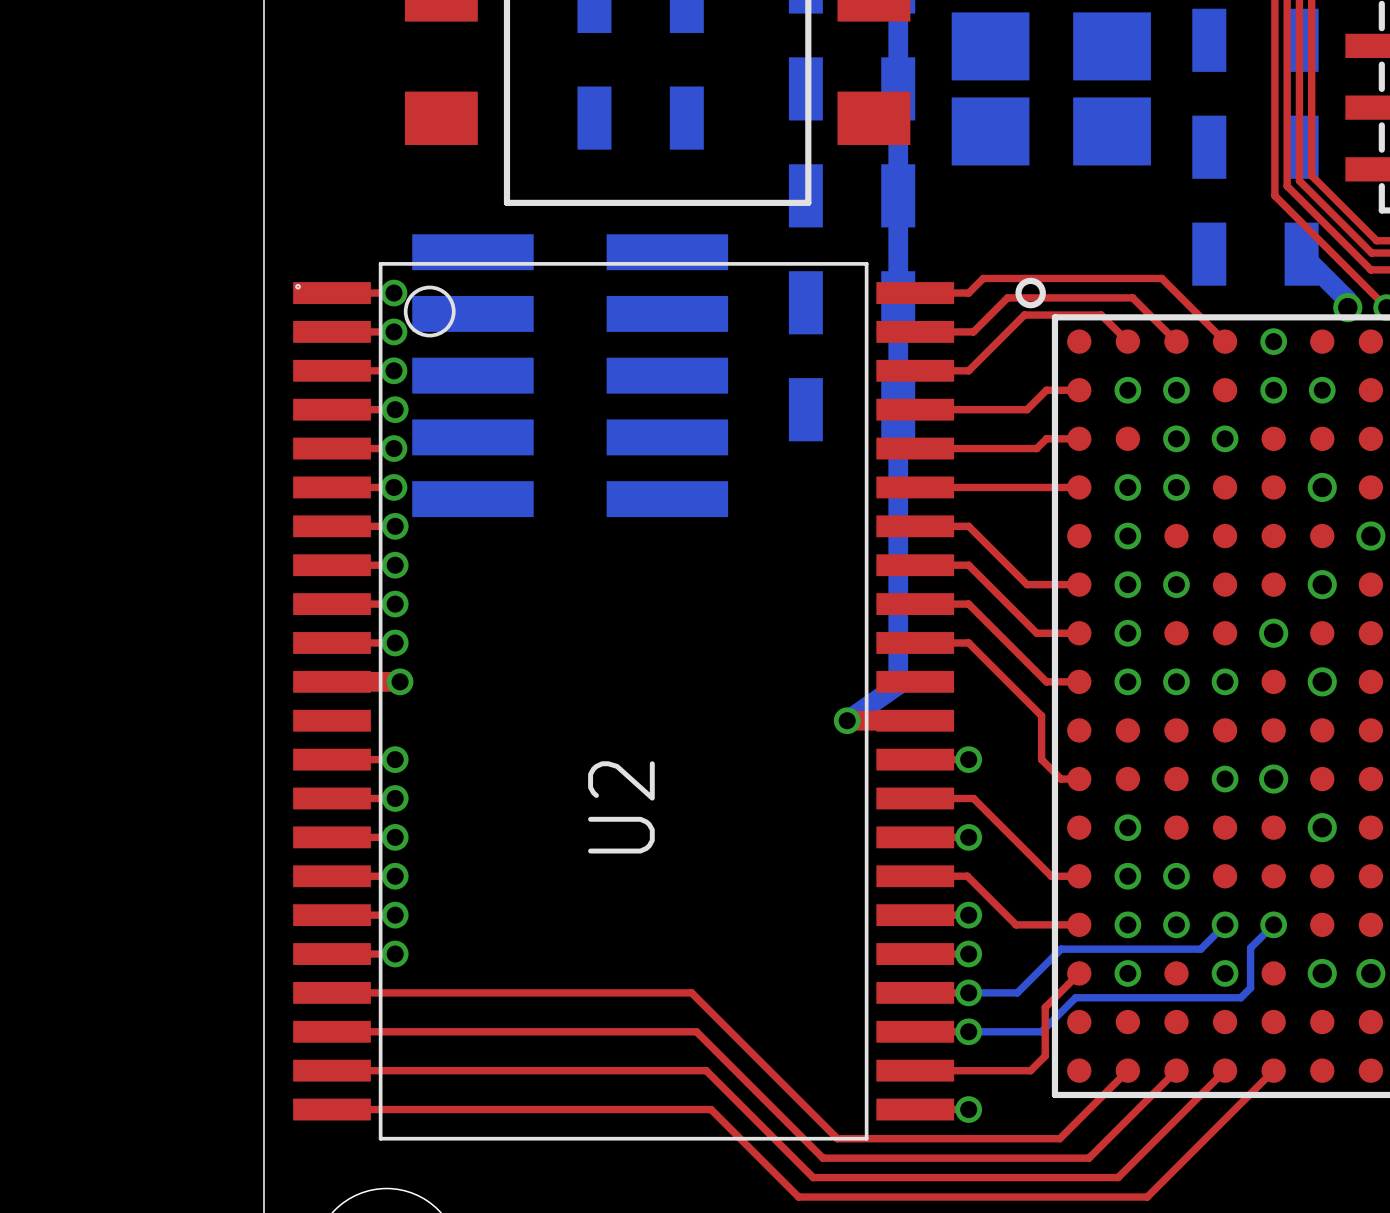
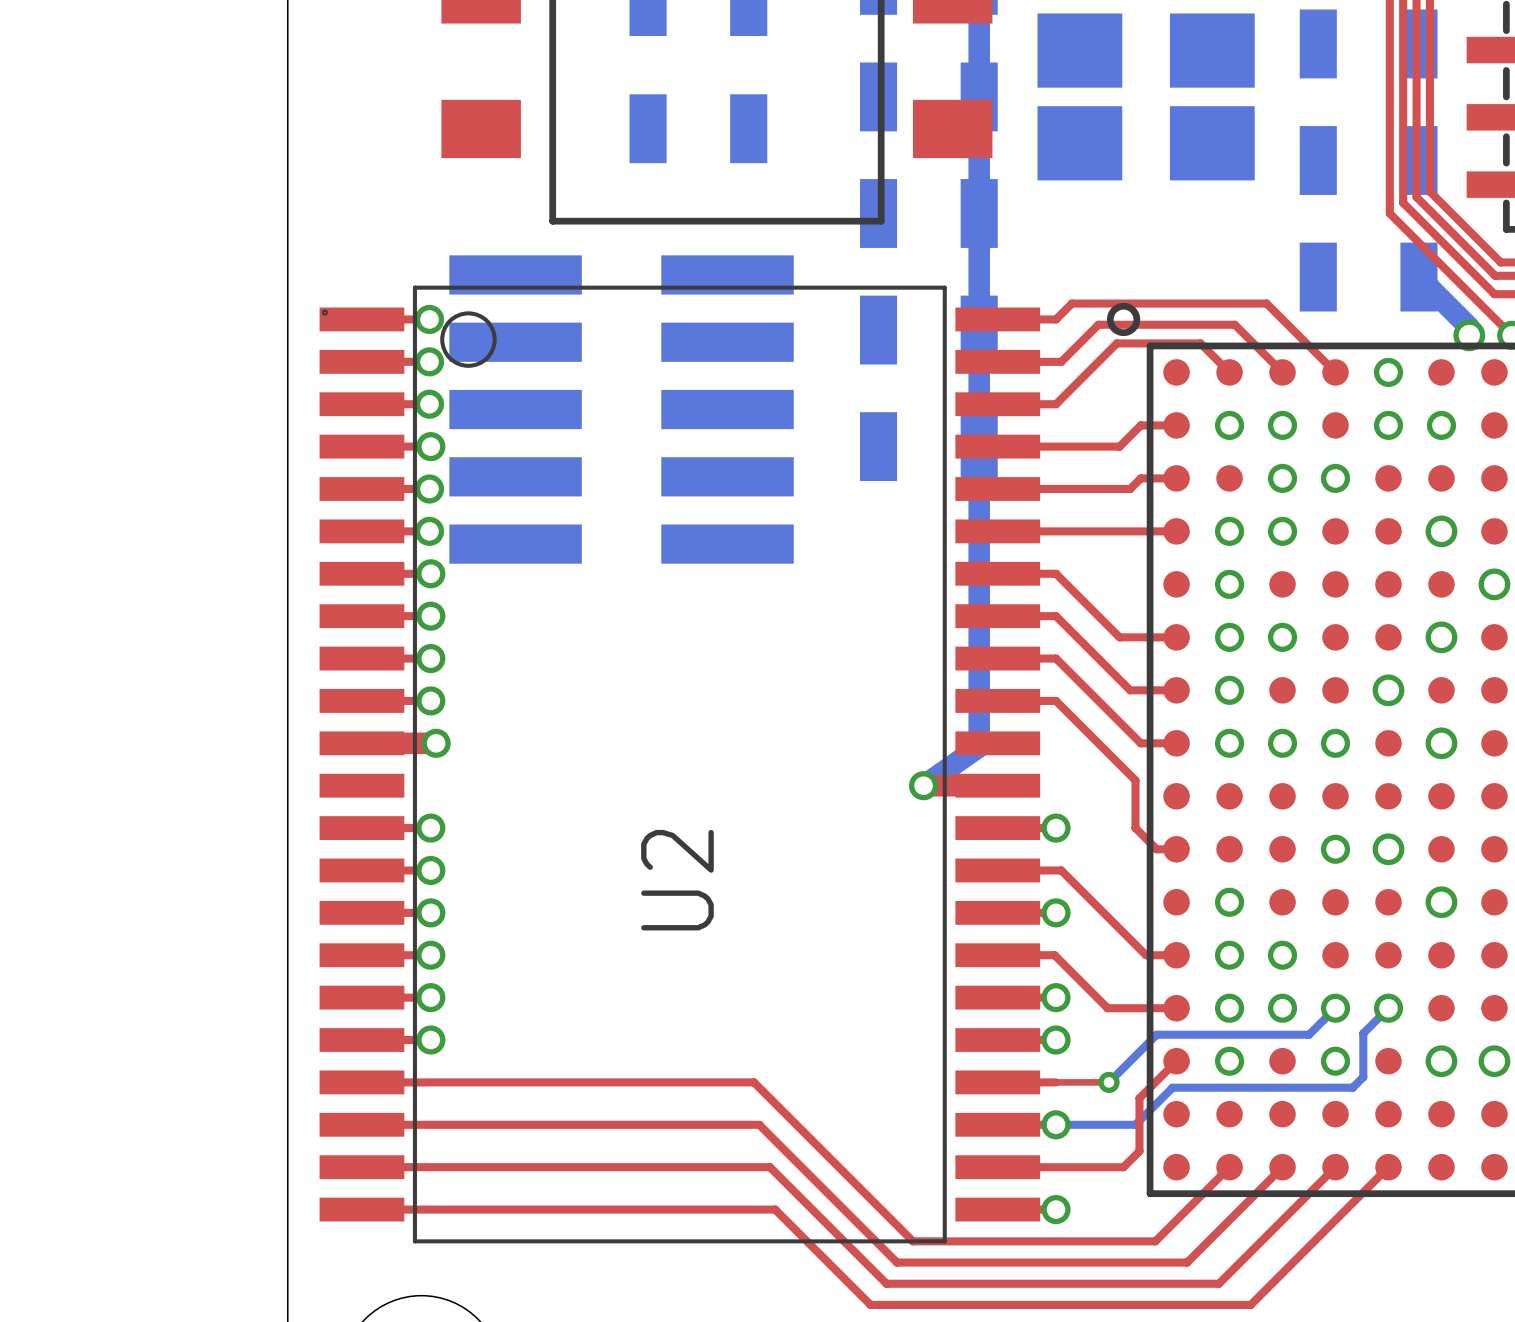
bottom track: (968, 992) (1017, 992) -> none
top track: none -> (1056, 1082) (1109, 1082)
via: (968, 992) -> none
via: none -> (1109, 1082)

